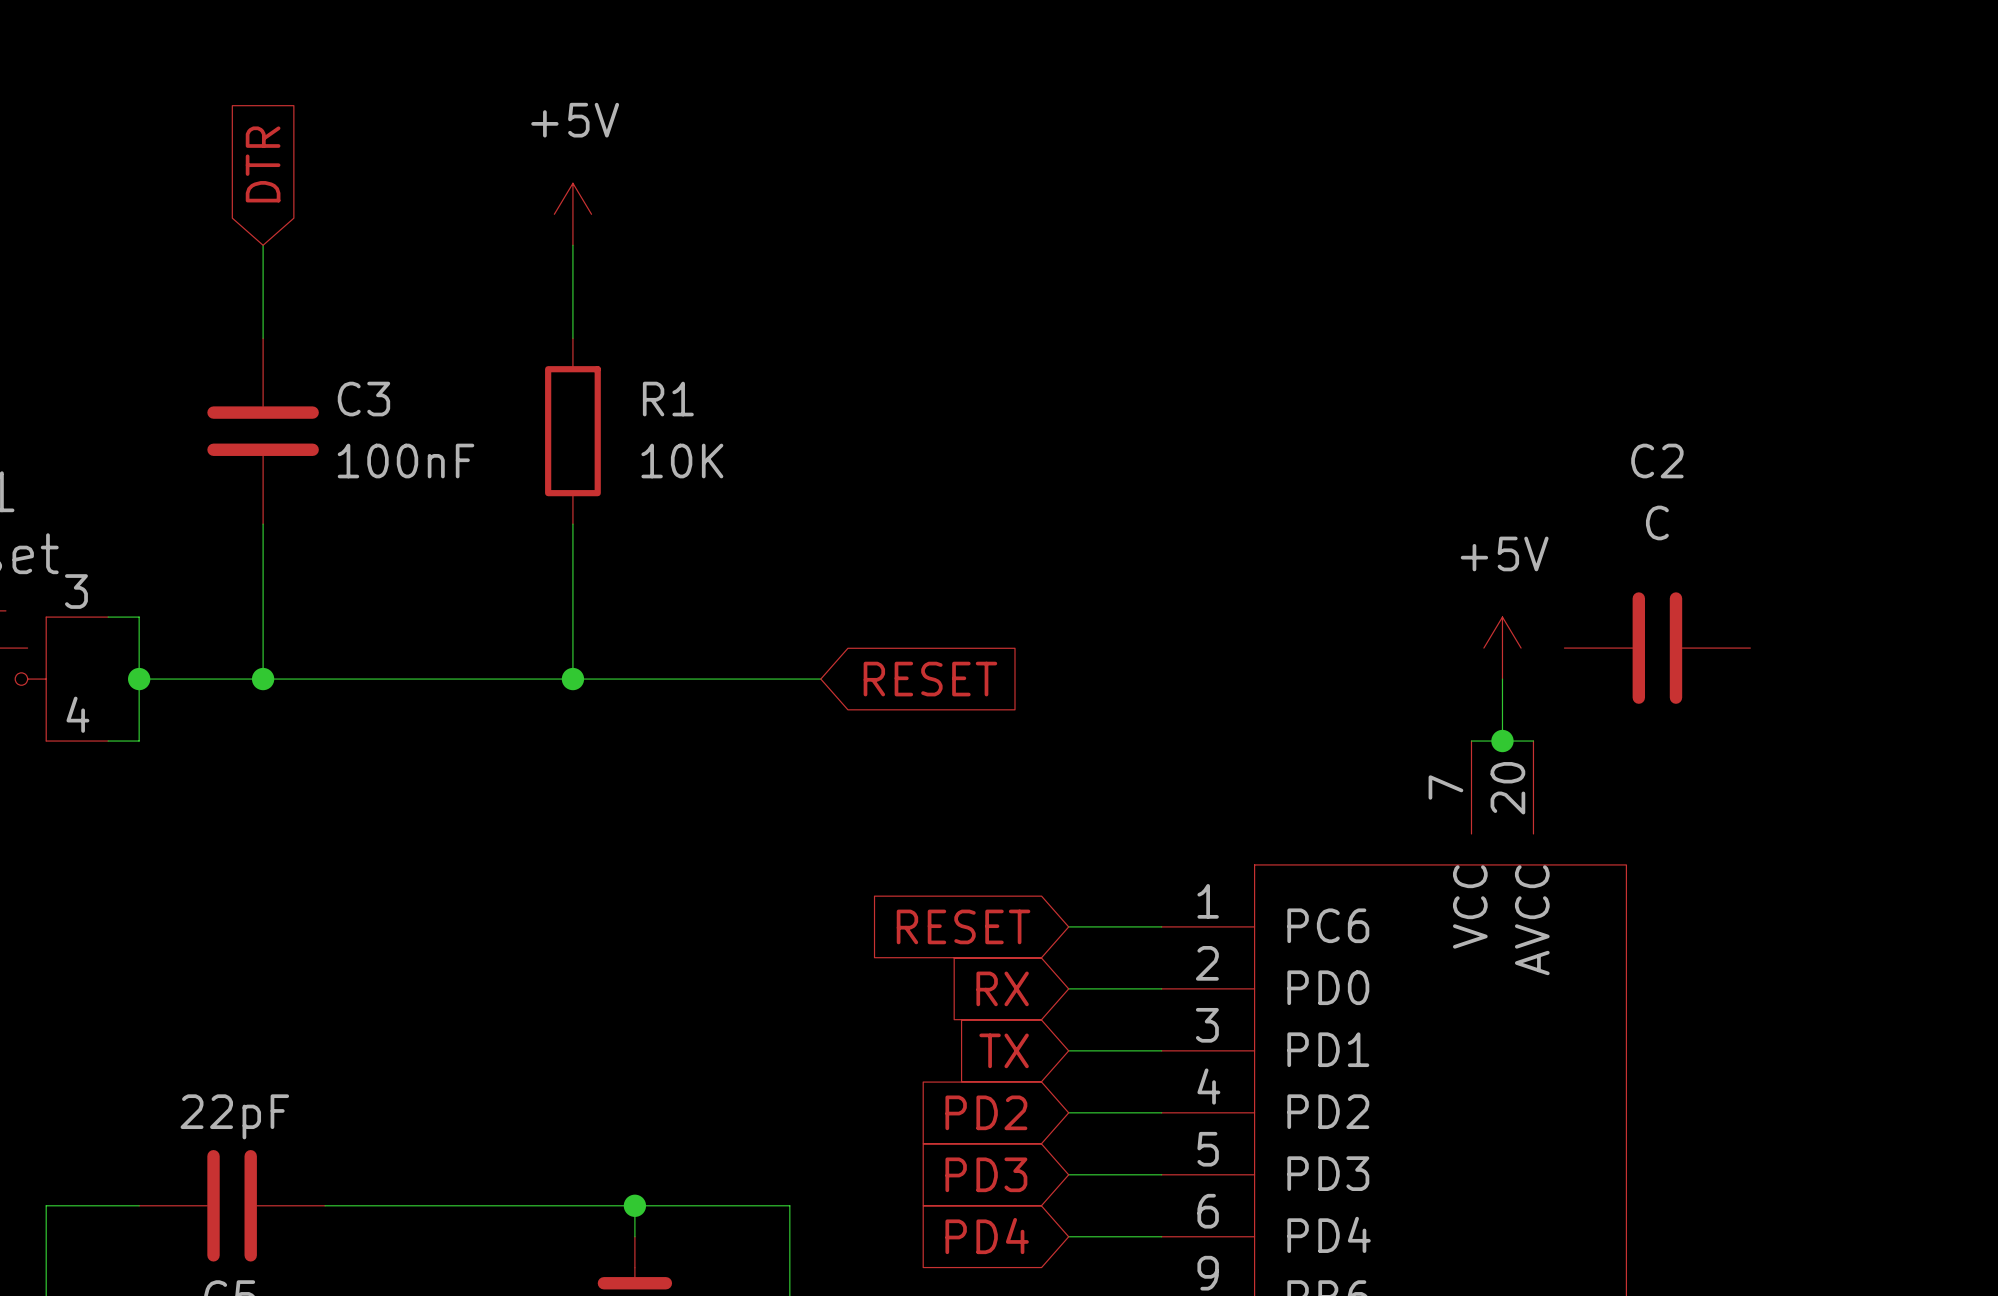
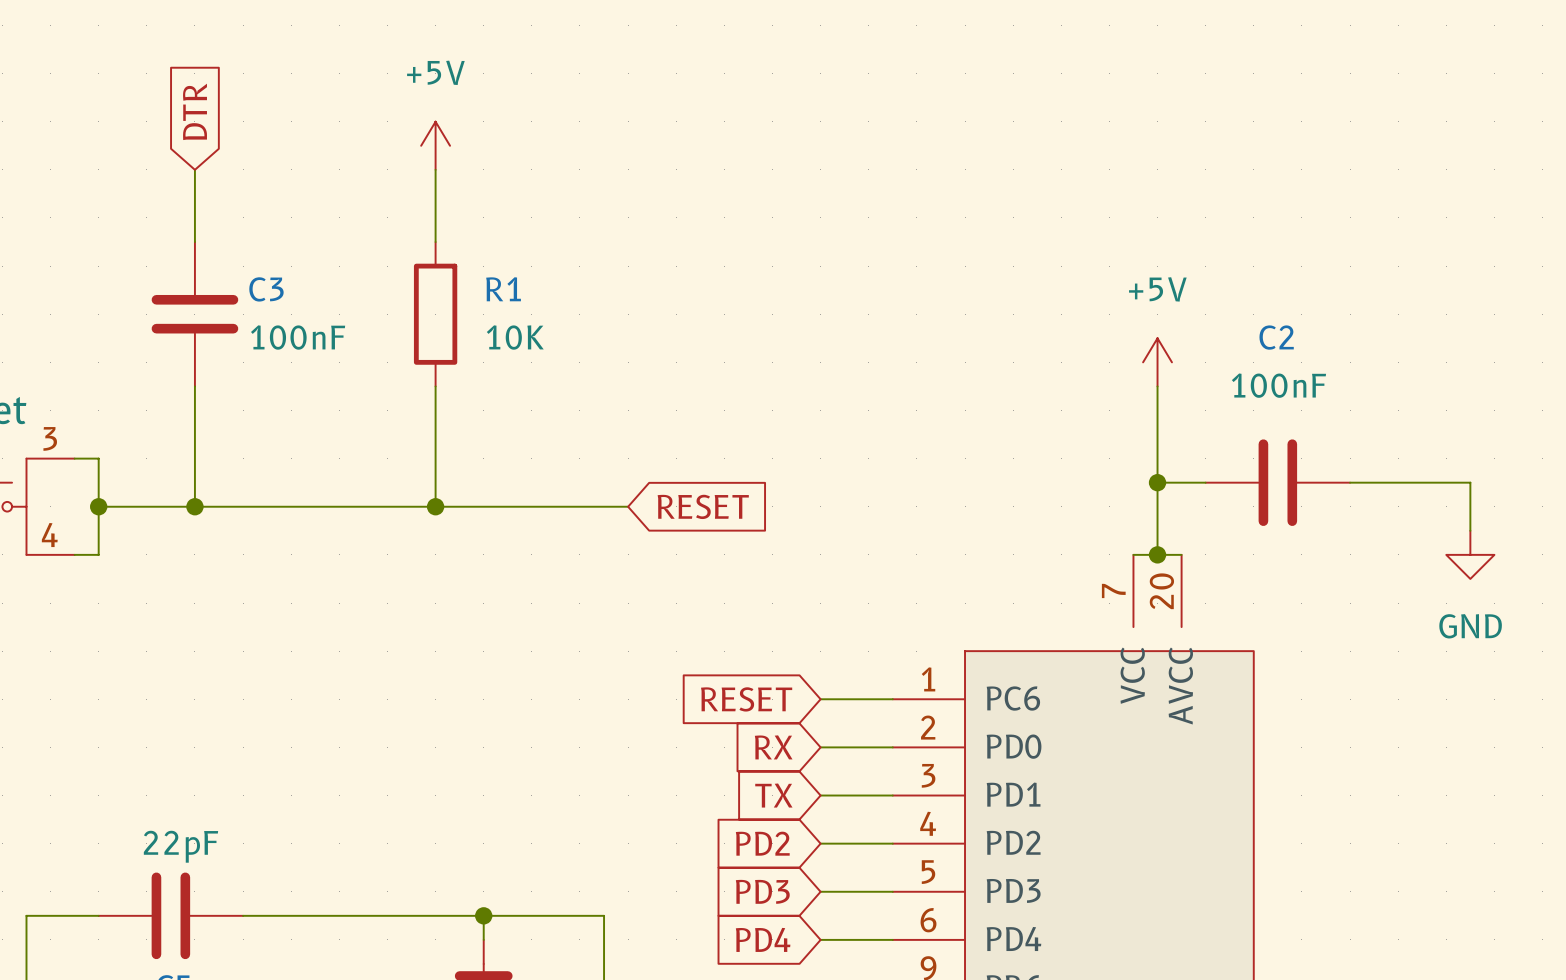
C2 value: C (1657, 522) -> 100nF (1278, 385)
wire: none -> (1157, 386) (1157, 506)
wire: none -> (1157, 482) (1205, 482)
power symbol position: +5V (1502, 648) -> +5V (1157, 362)
junction: none -> (1157, 482)
wire: none -> (1350, 482) (1470, 482) (1470, 530)
power symbol: none -> GND (1470, 554)

